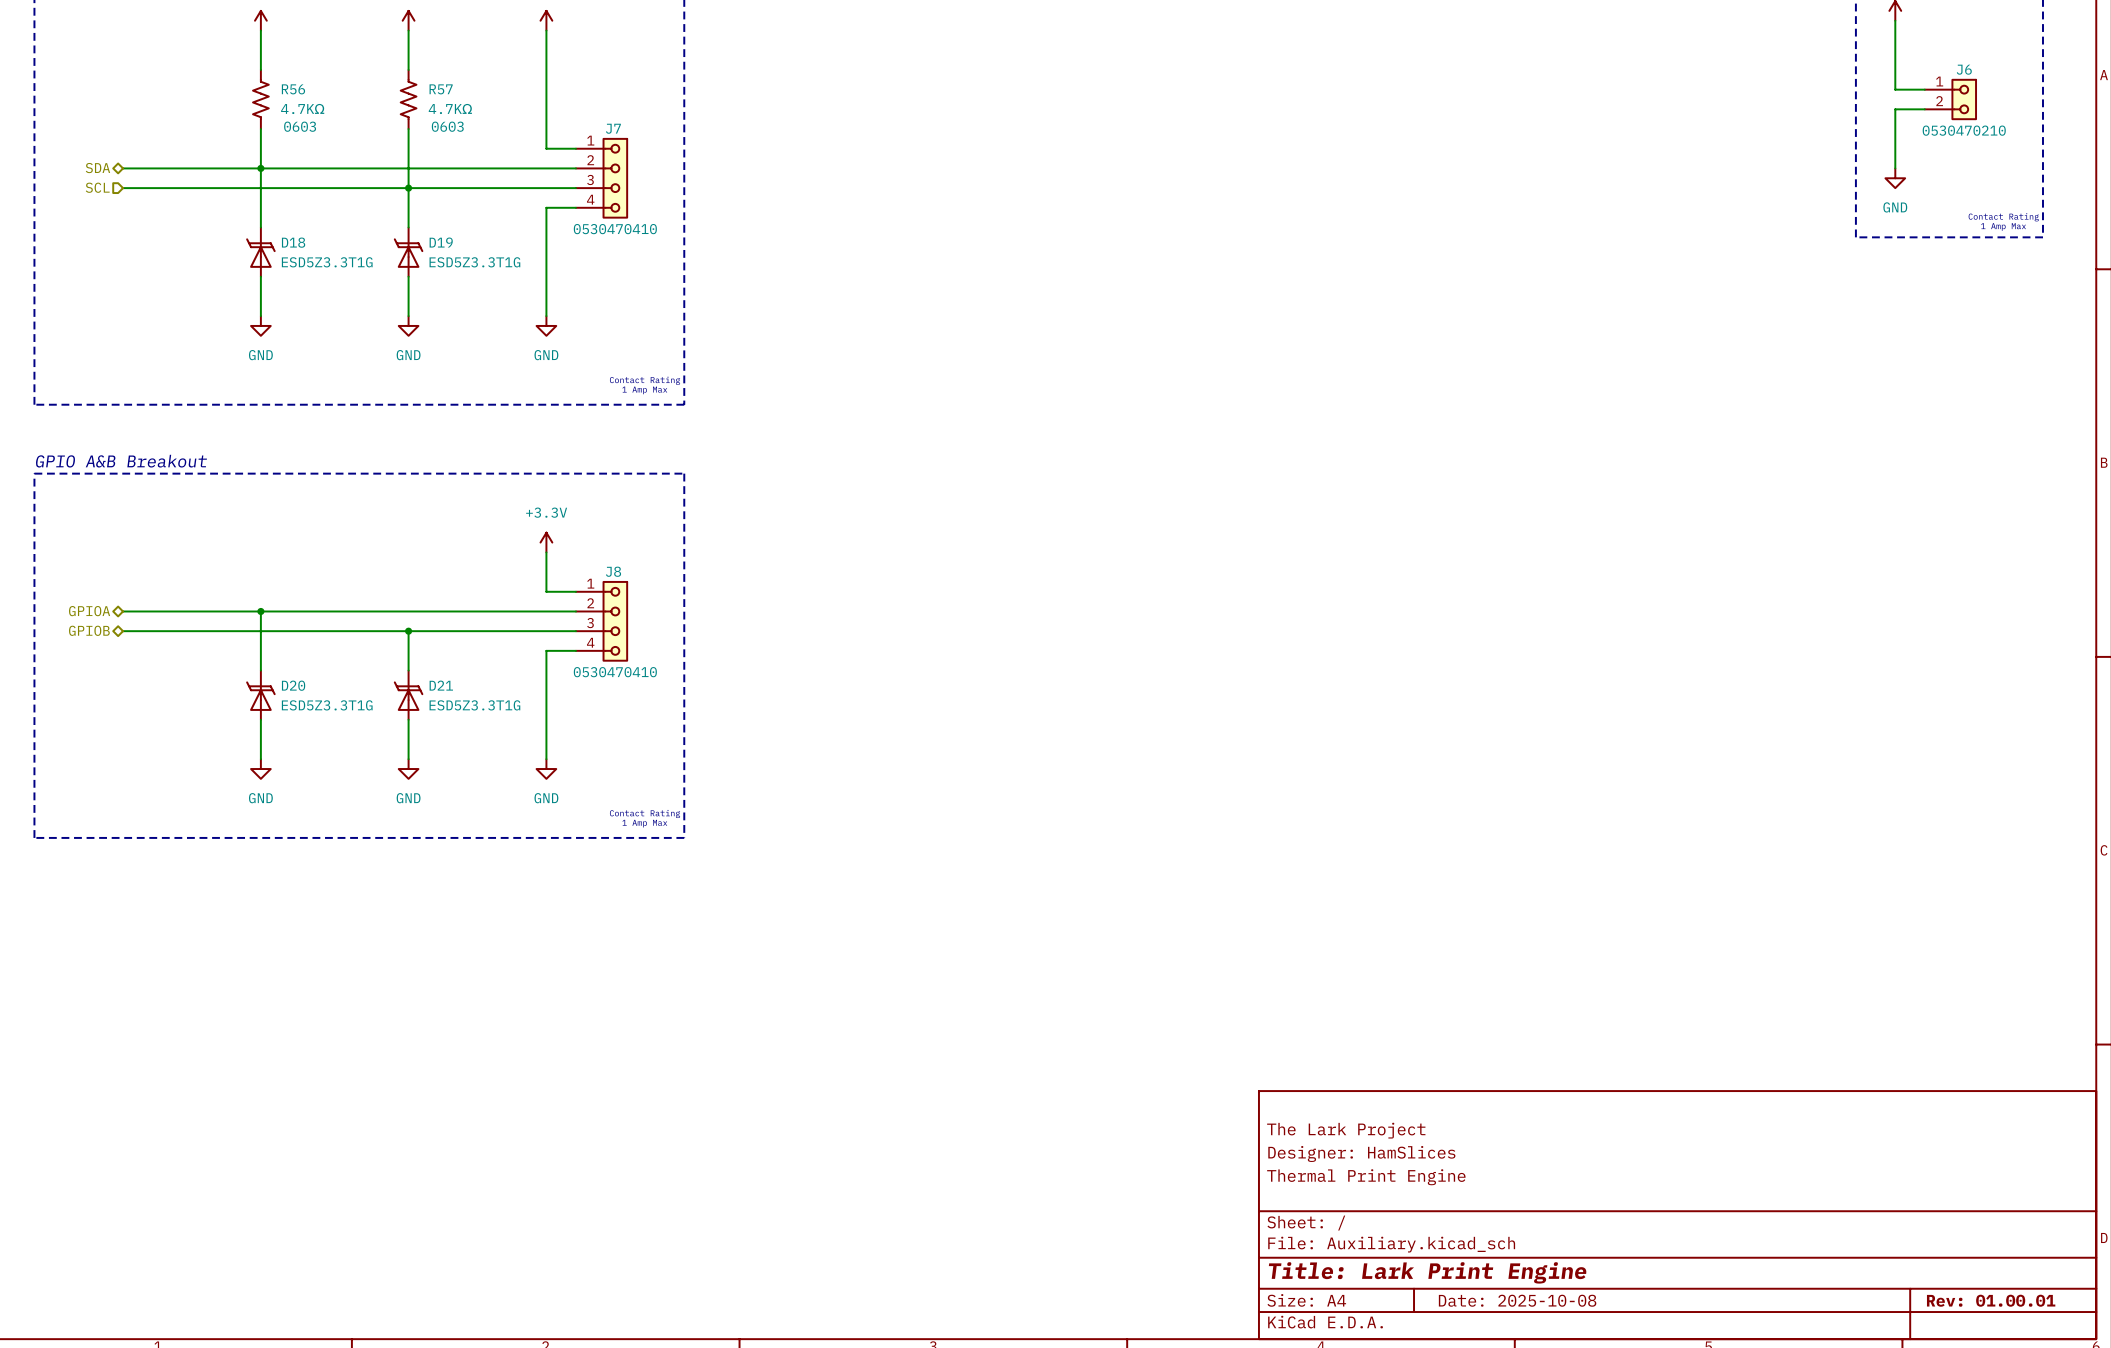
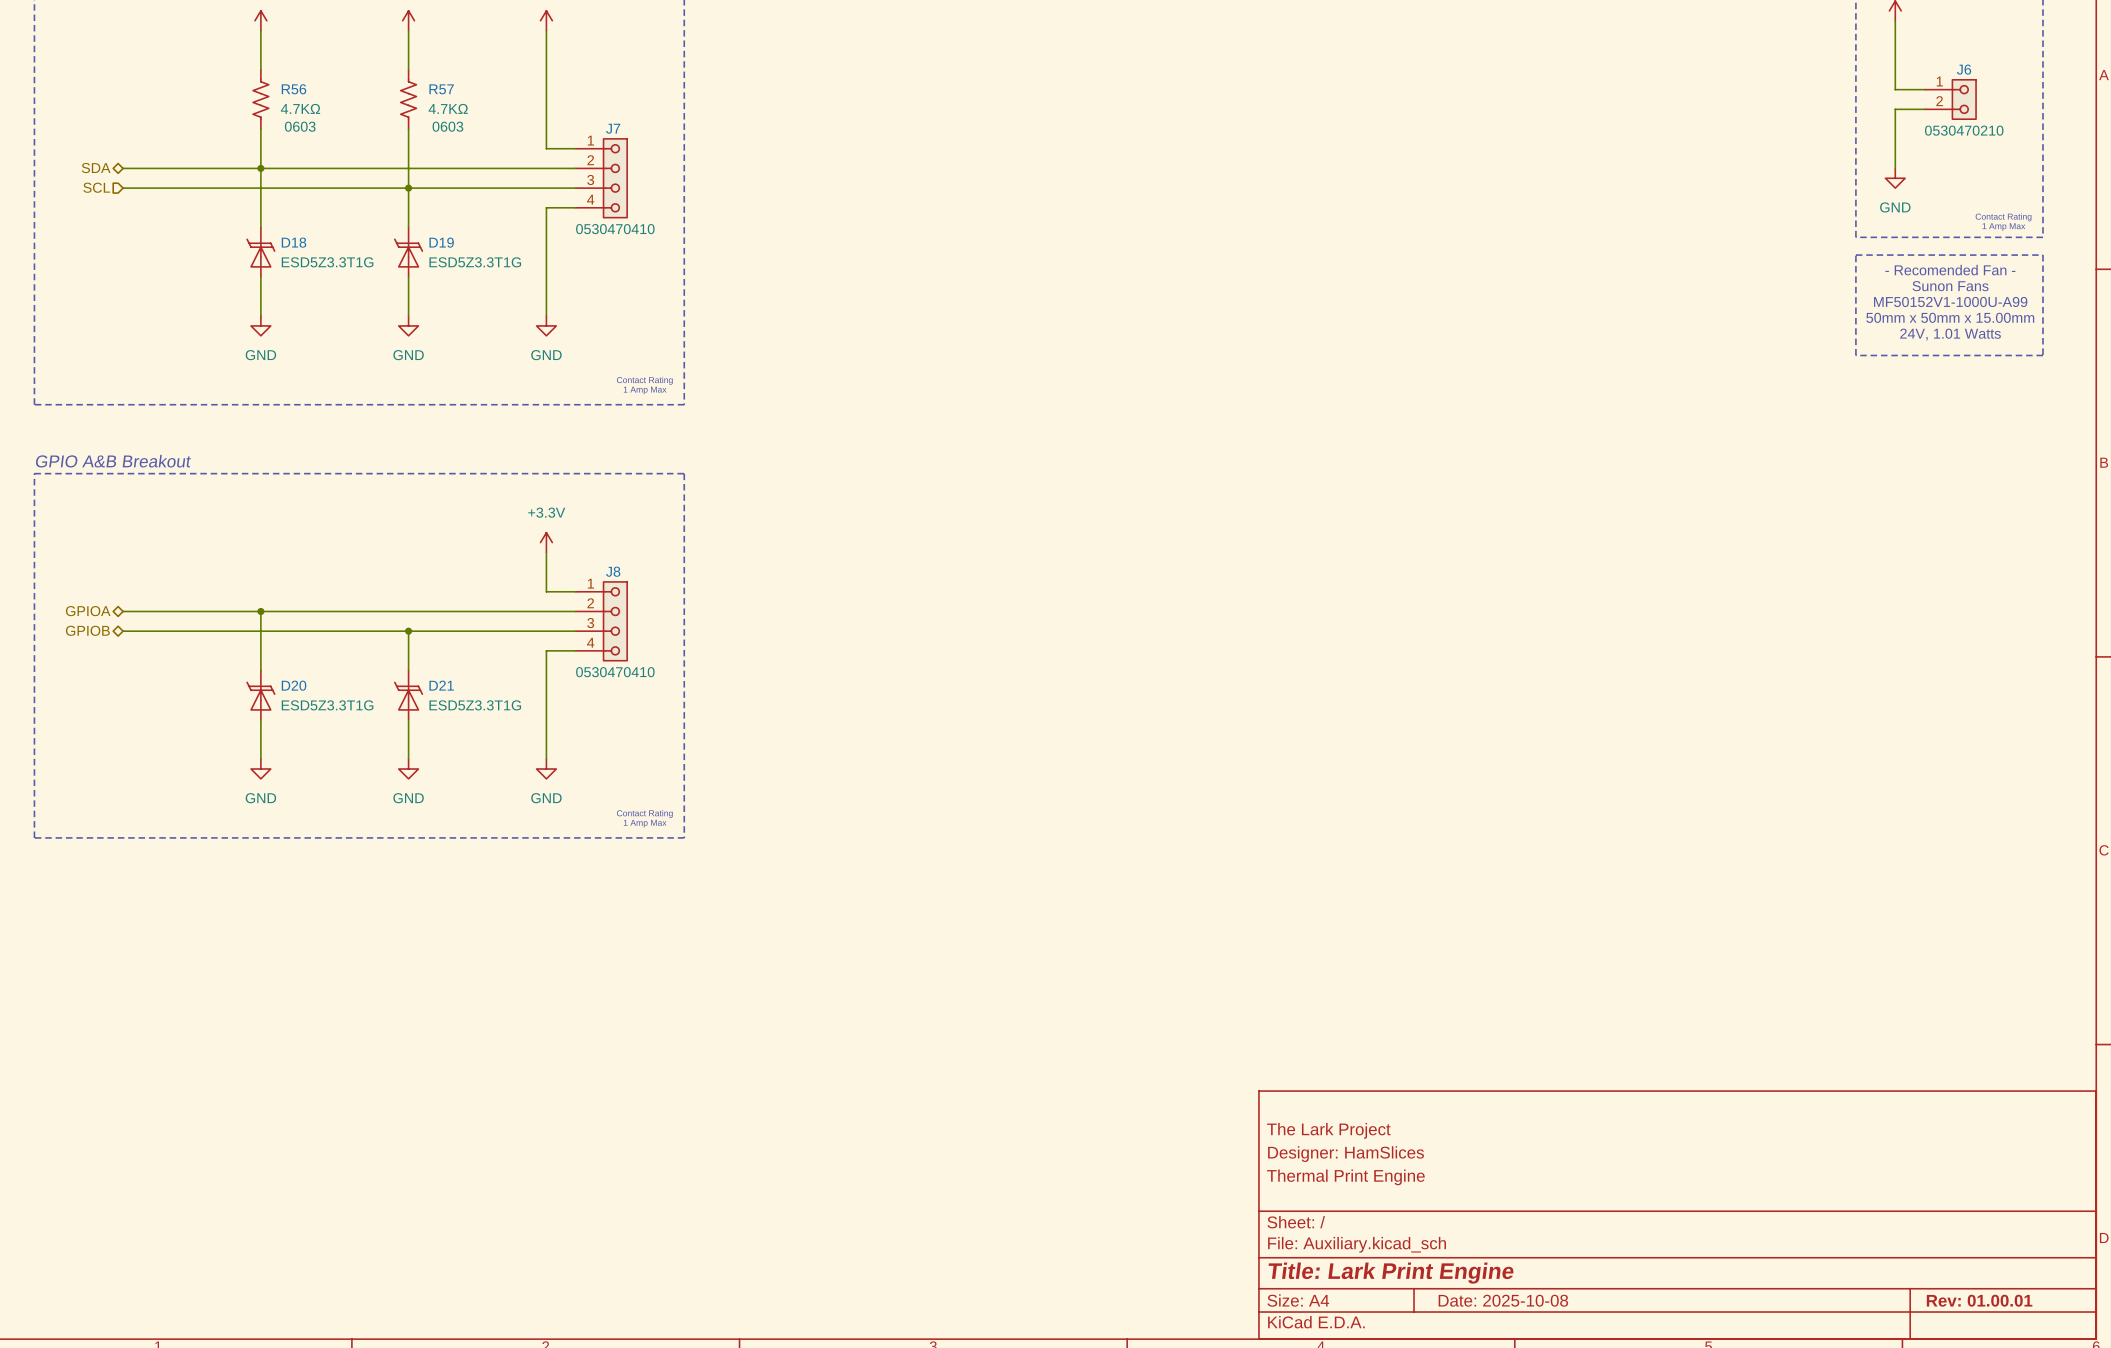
line: none -> (1855, 255) (2042, 255) (2042, 355) (1855, 355) (1855, 255)
text: none -> - Recomended Fan - (1950, 270)
text: none -> Sunon Fans (1950, 286)
text: none -> MF50152V1-1000U-A99 (1950, 301)
text: none -> 50mm x 50mm x 15.00mm (1950, 317)
text: none -> 24V, 1.01 Watts (1950, 334)

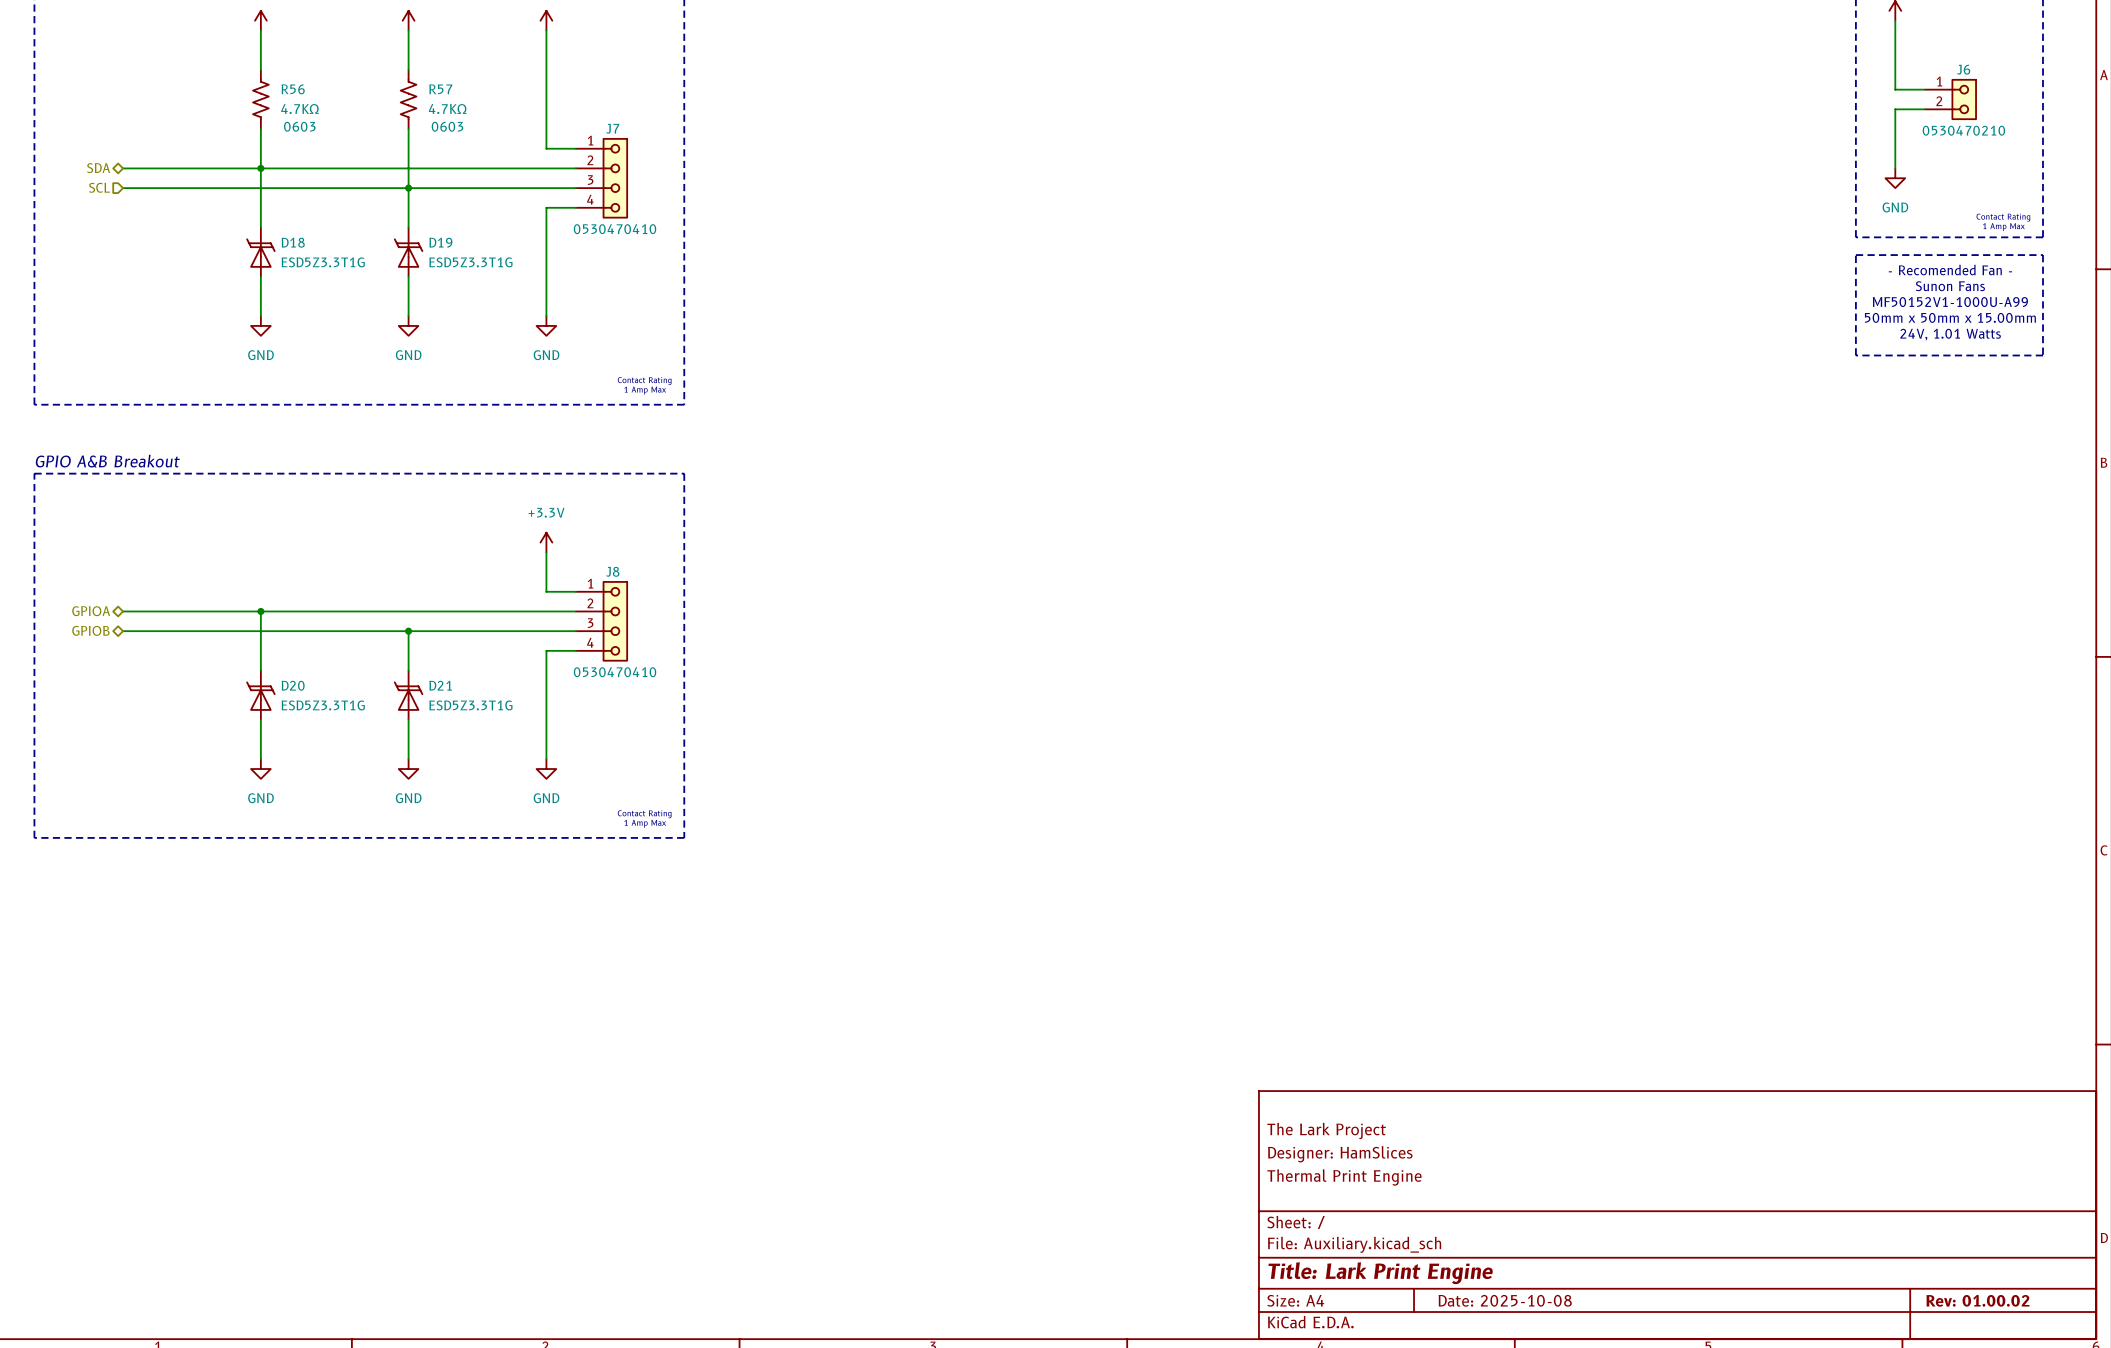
title block: Rev: 01.00.01 (1979, 1300) -> Rev: 01.00.02 (1977, 1300)

